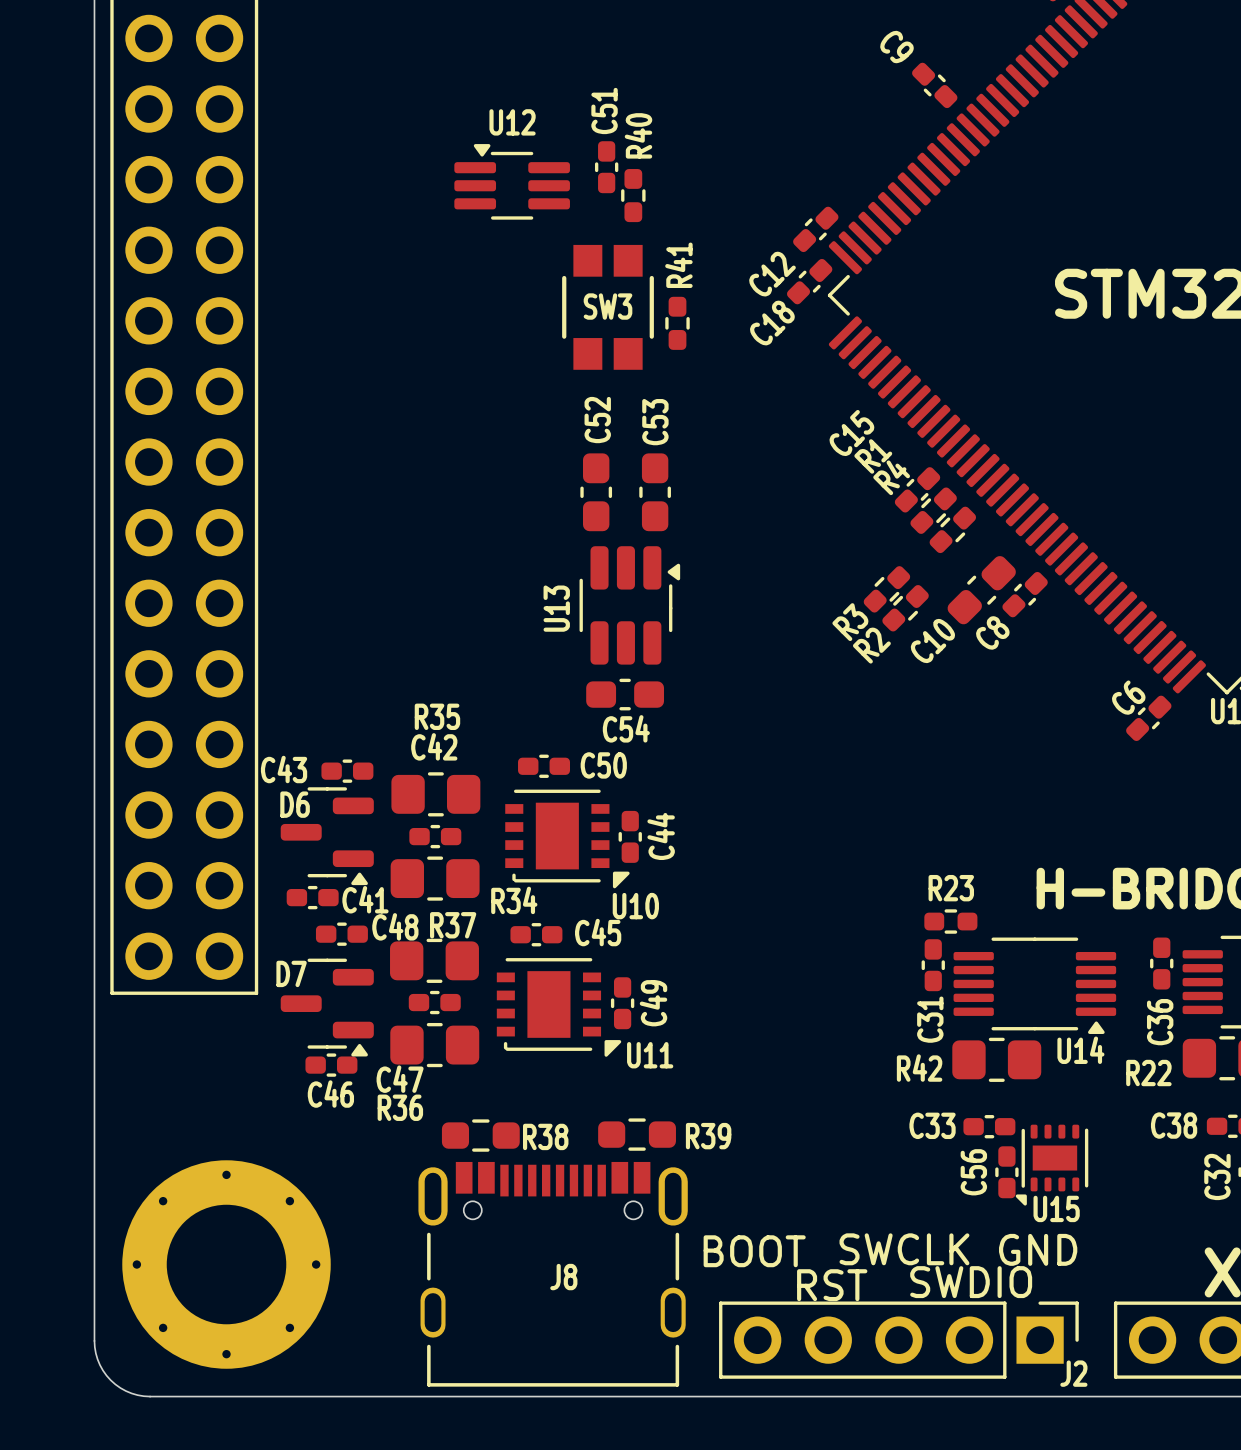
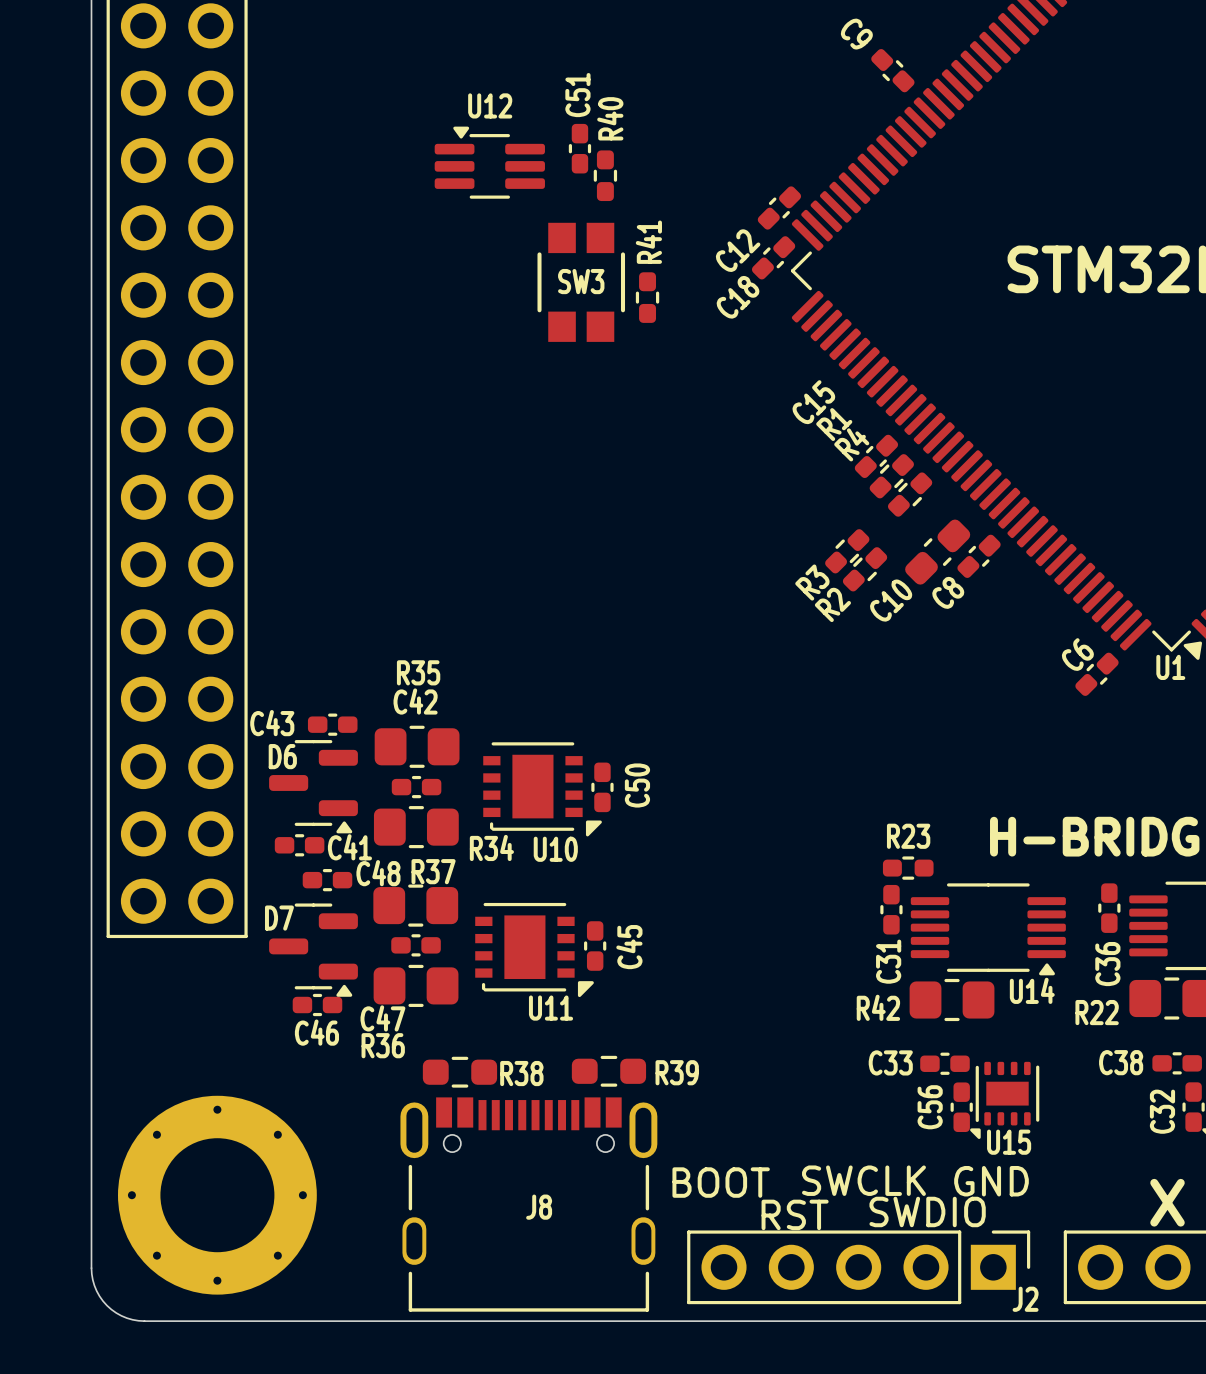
C52: (596, 492) -> none
C53: (655, 492) -> none
U13: (629, 605) -> none
C54: (625, 694) -> none
C50: (544, 766) -> none
C44 name: C44 (661, 836) -> C50 (637, 785)
U10 name position: U10 (635, 906) -> U10 (555, 849)
C45: (536, 934) -> none
C49 name: C49 (653, 1003) -> C45 (629, 947)
U11 name position: U11 (650, 1055) -> U11 (551, 1008)

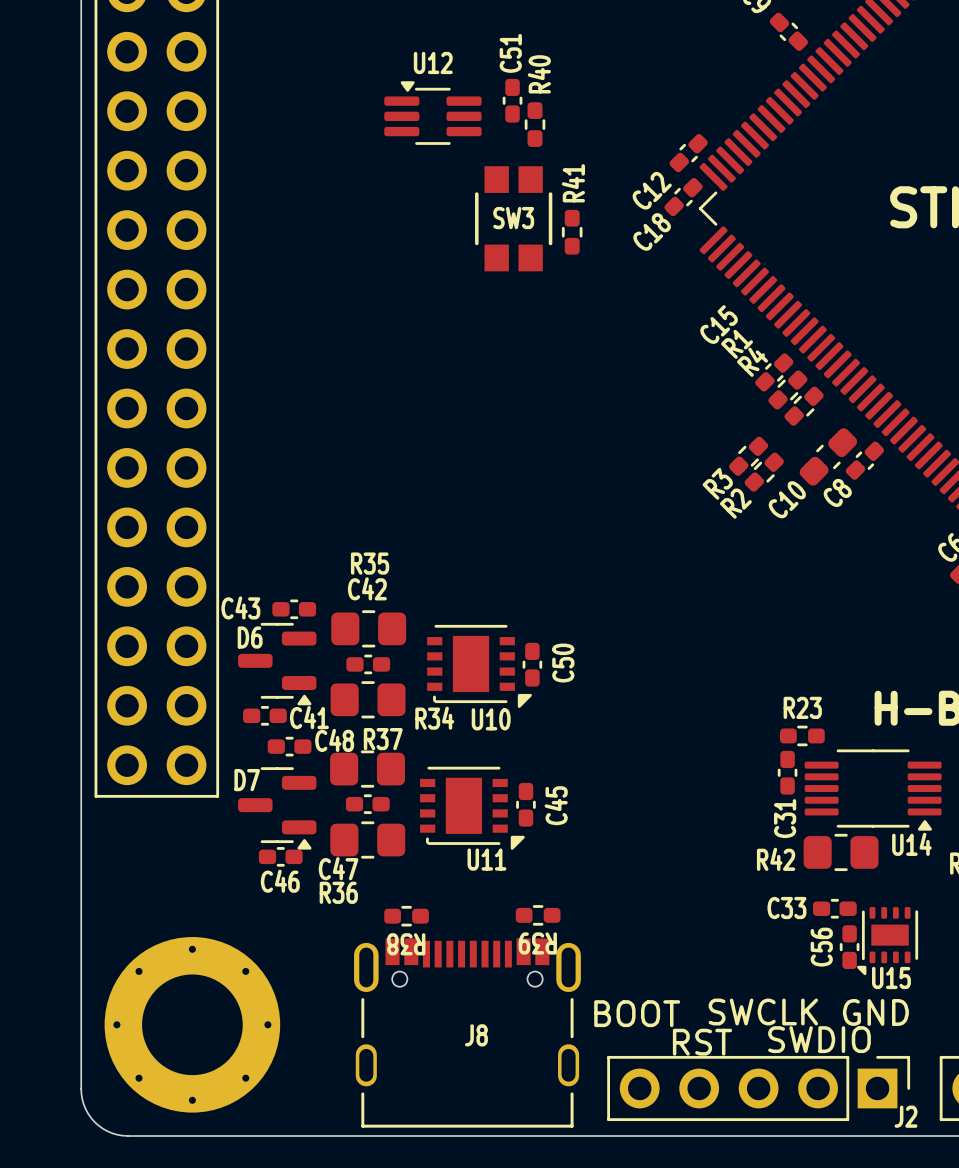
R39 footprint: [571, 1055, 647, 1087] -> [515, 905, 561, 926]
R38 footprint: [422, 1056, 498, 1088] -> [384, 905, 429, 927]
R39 name rotation: 0° (677, 1072) -> 180° (537, 943)
R39 name position: R39 (677, 1072) -> R39 (537, 943)
R38 name rotation: 0° (521, 1073) -> 180° (406, 944)
R38 name position: R38 (521, 1073) -> R38 (406, 944)

